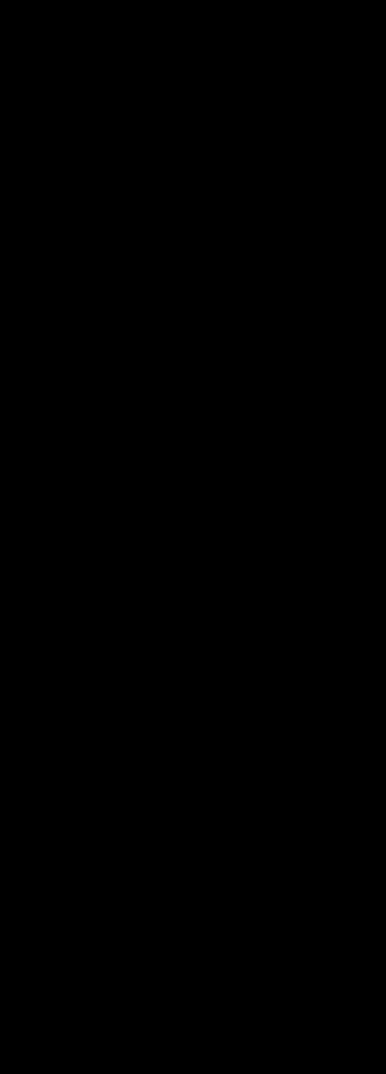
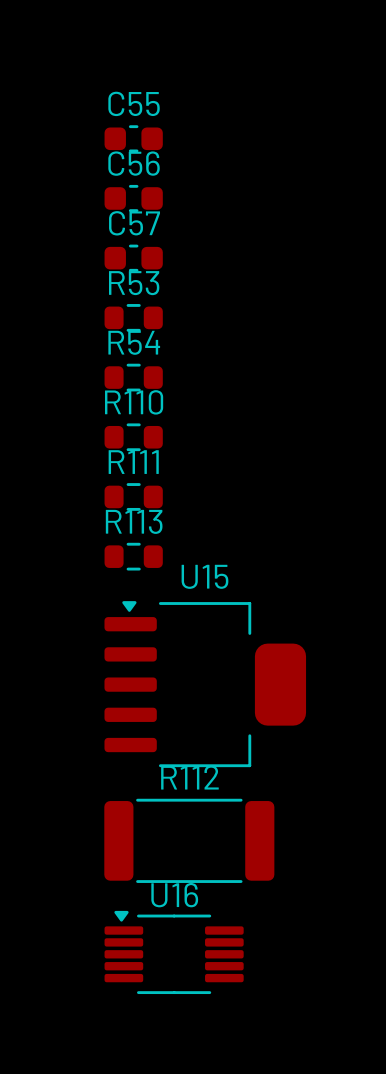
C55: none -> (133, 138)
C56: none -> (133, 198)
C57: none -> (133, 258)
R53: none -> (133, 317)
R54: none -> (133, 377)
R110: none -> (133, 437)
R111: none -> (133, 496)
R113: none -> (133, 556)
U15: none -> (205, 684)
R112: none -> (189, 840)
U16: none -> (174, 952)

